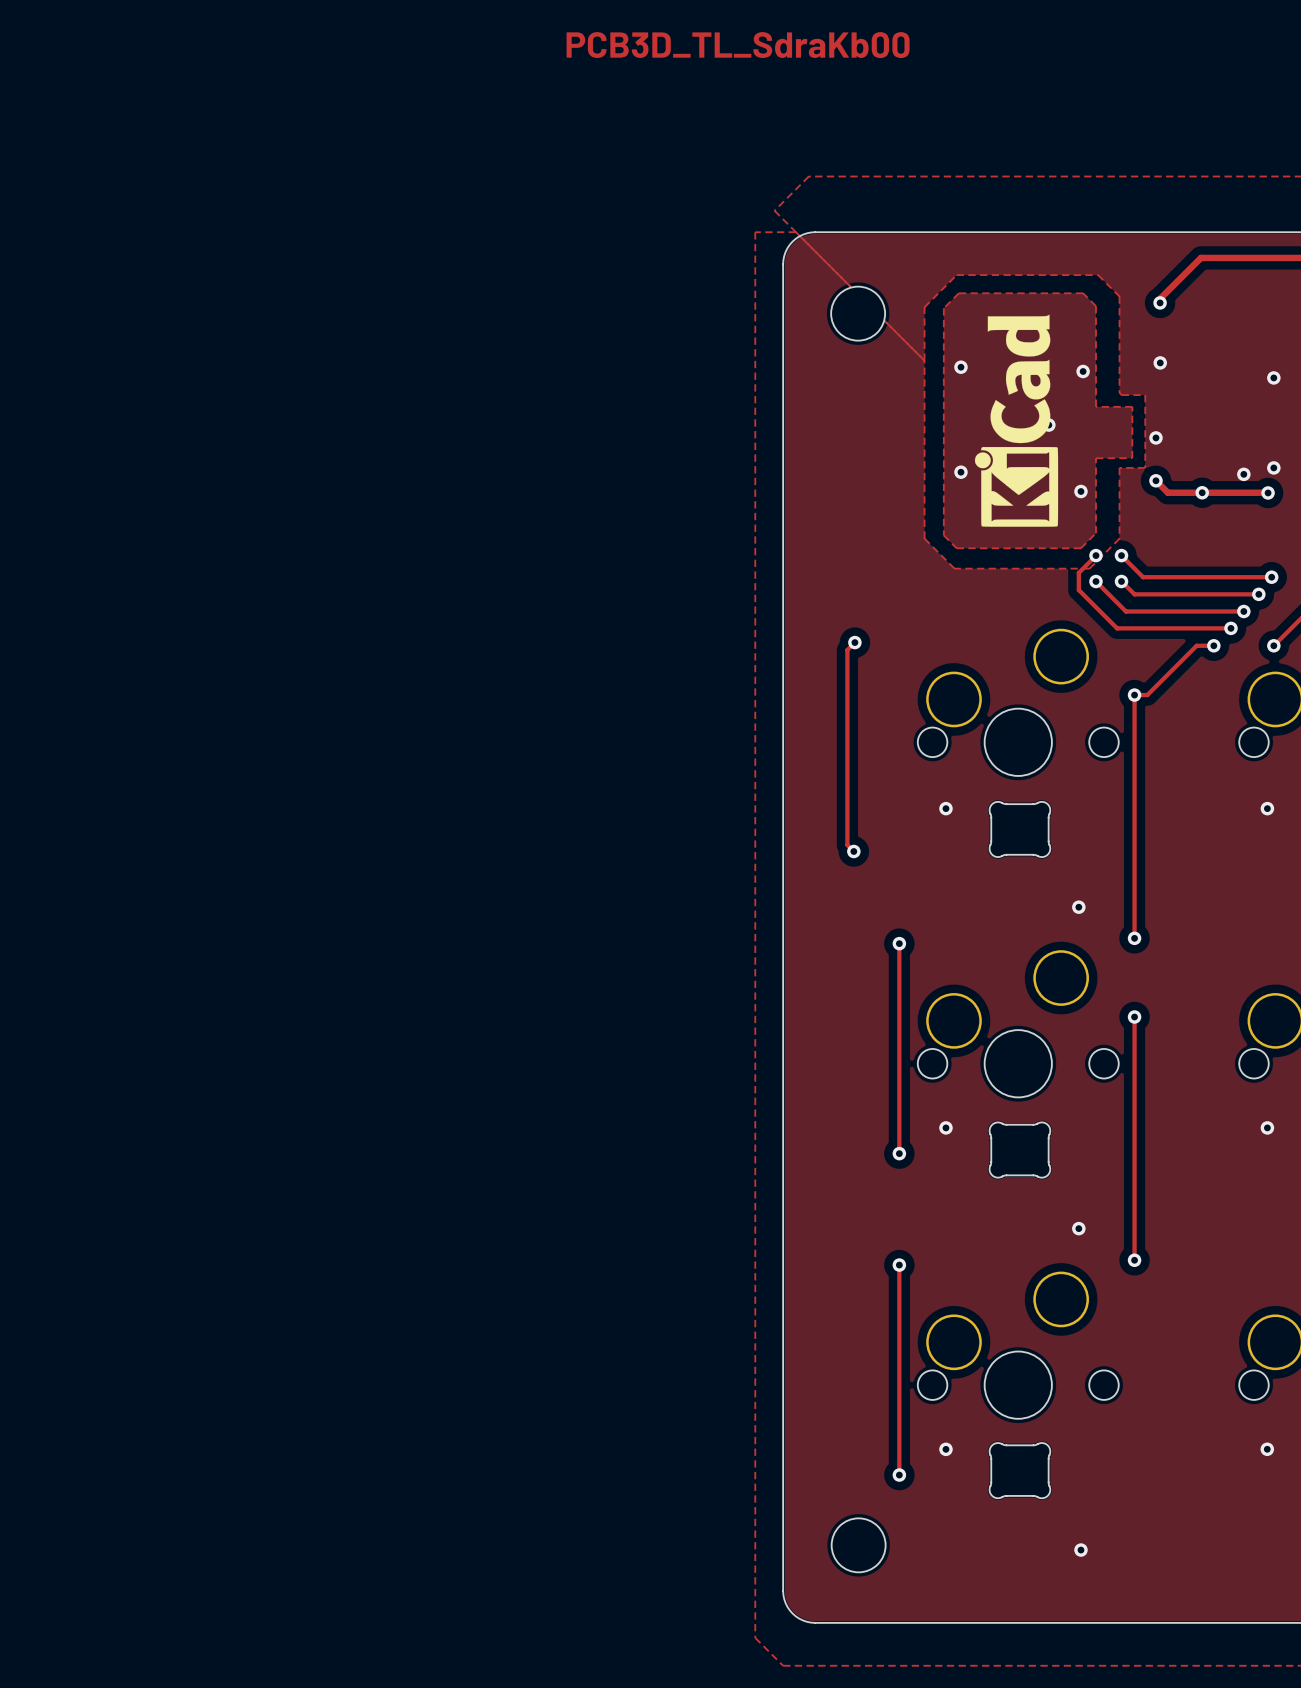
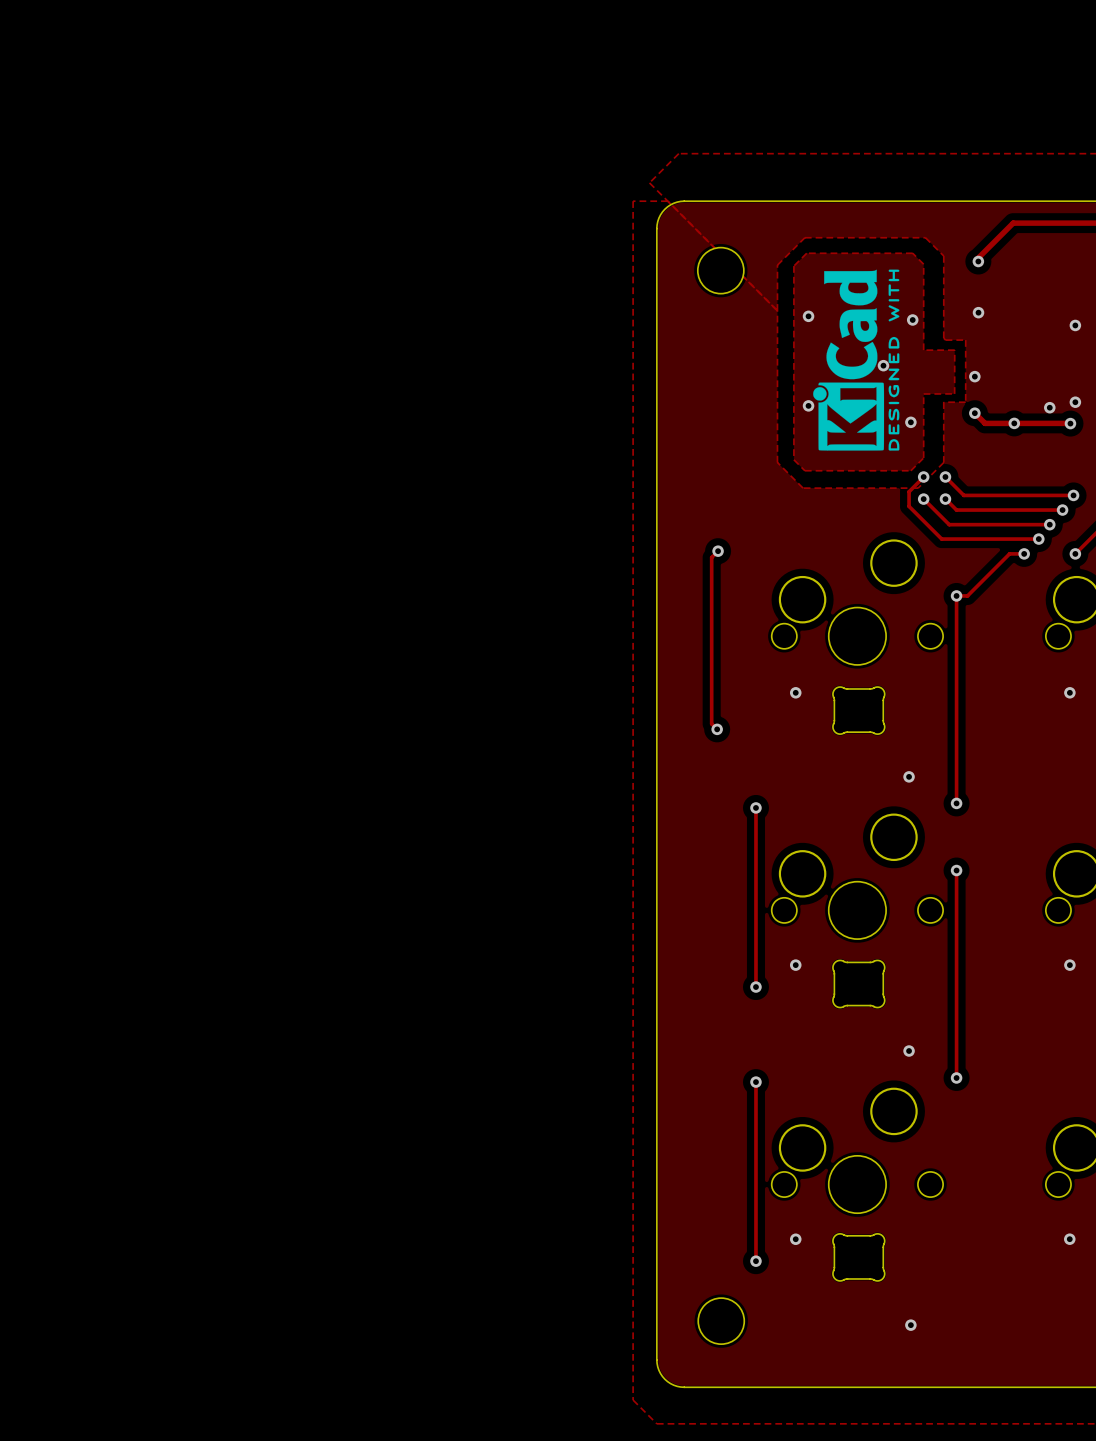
text: PCB3D_TL_SdraKb00 (738, 45) -> none
drawing shape: [974, 314, 1059, 527] -> [813, 269, 900, 451]

